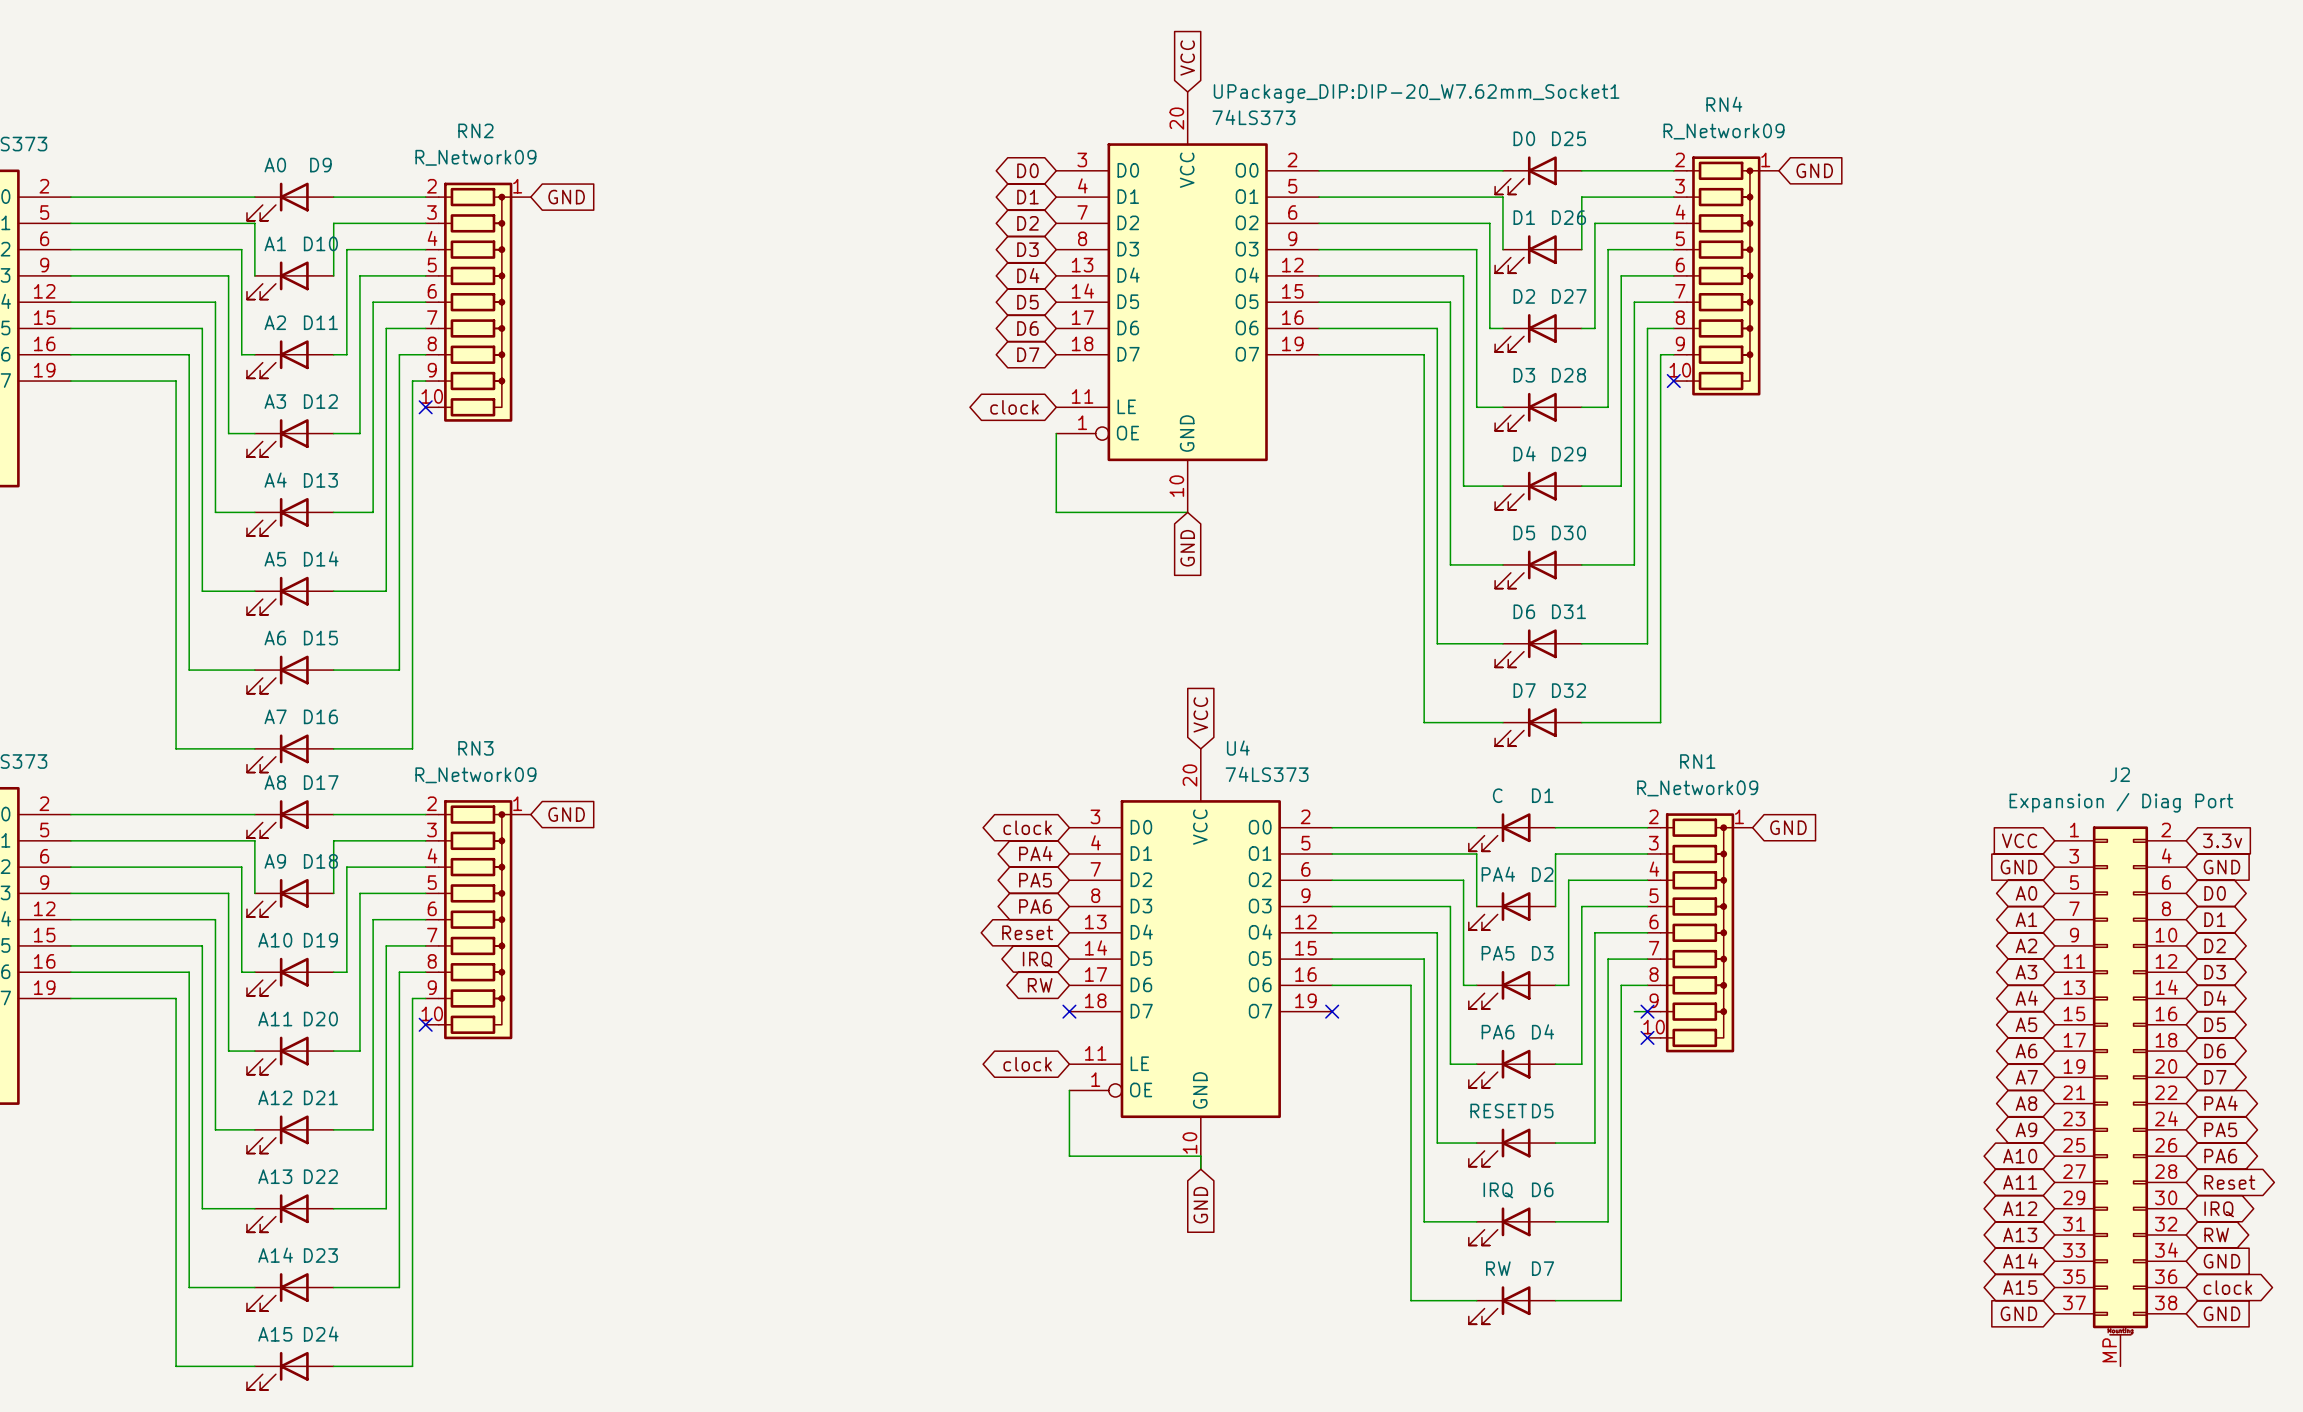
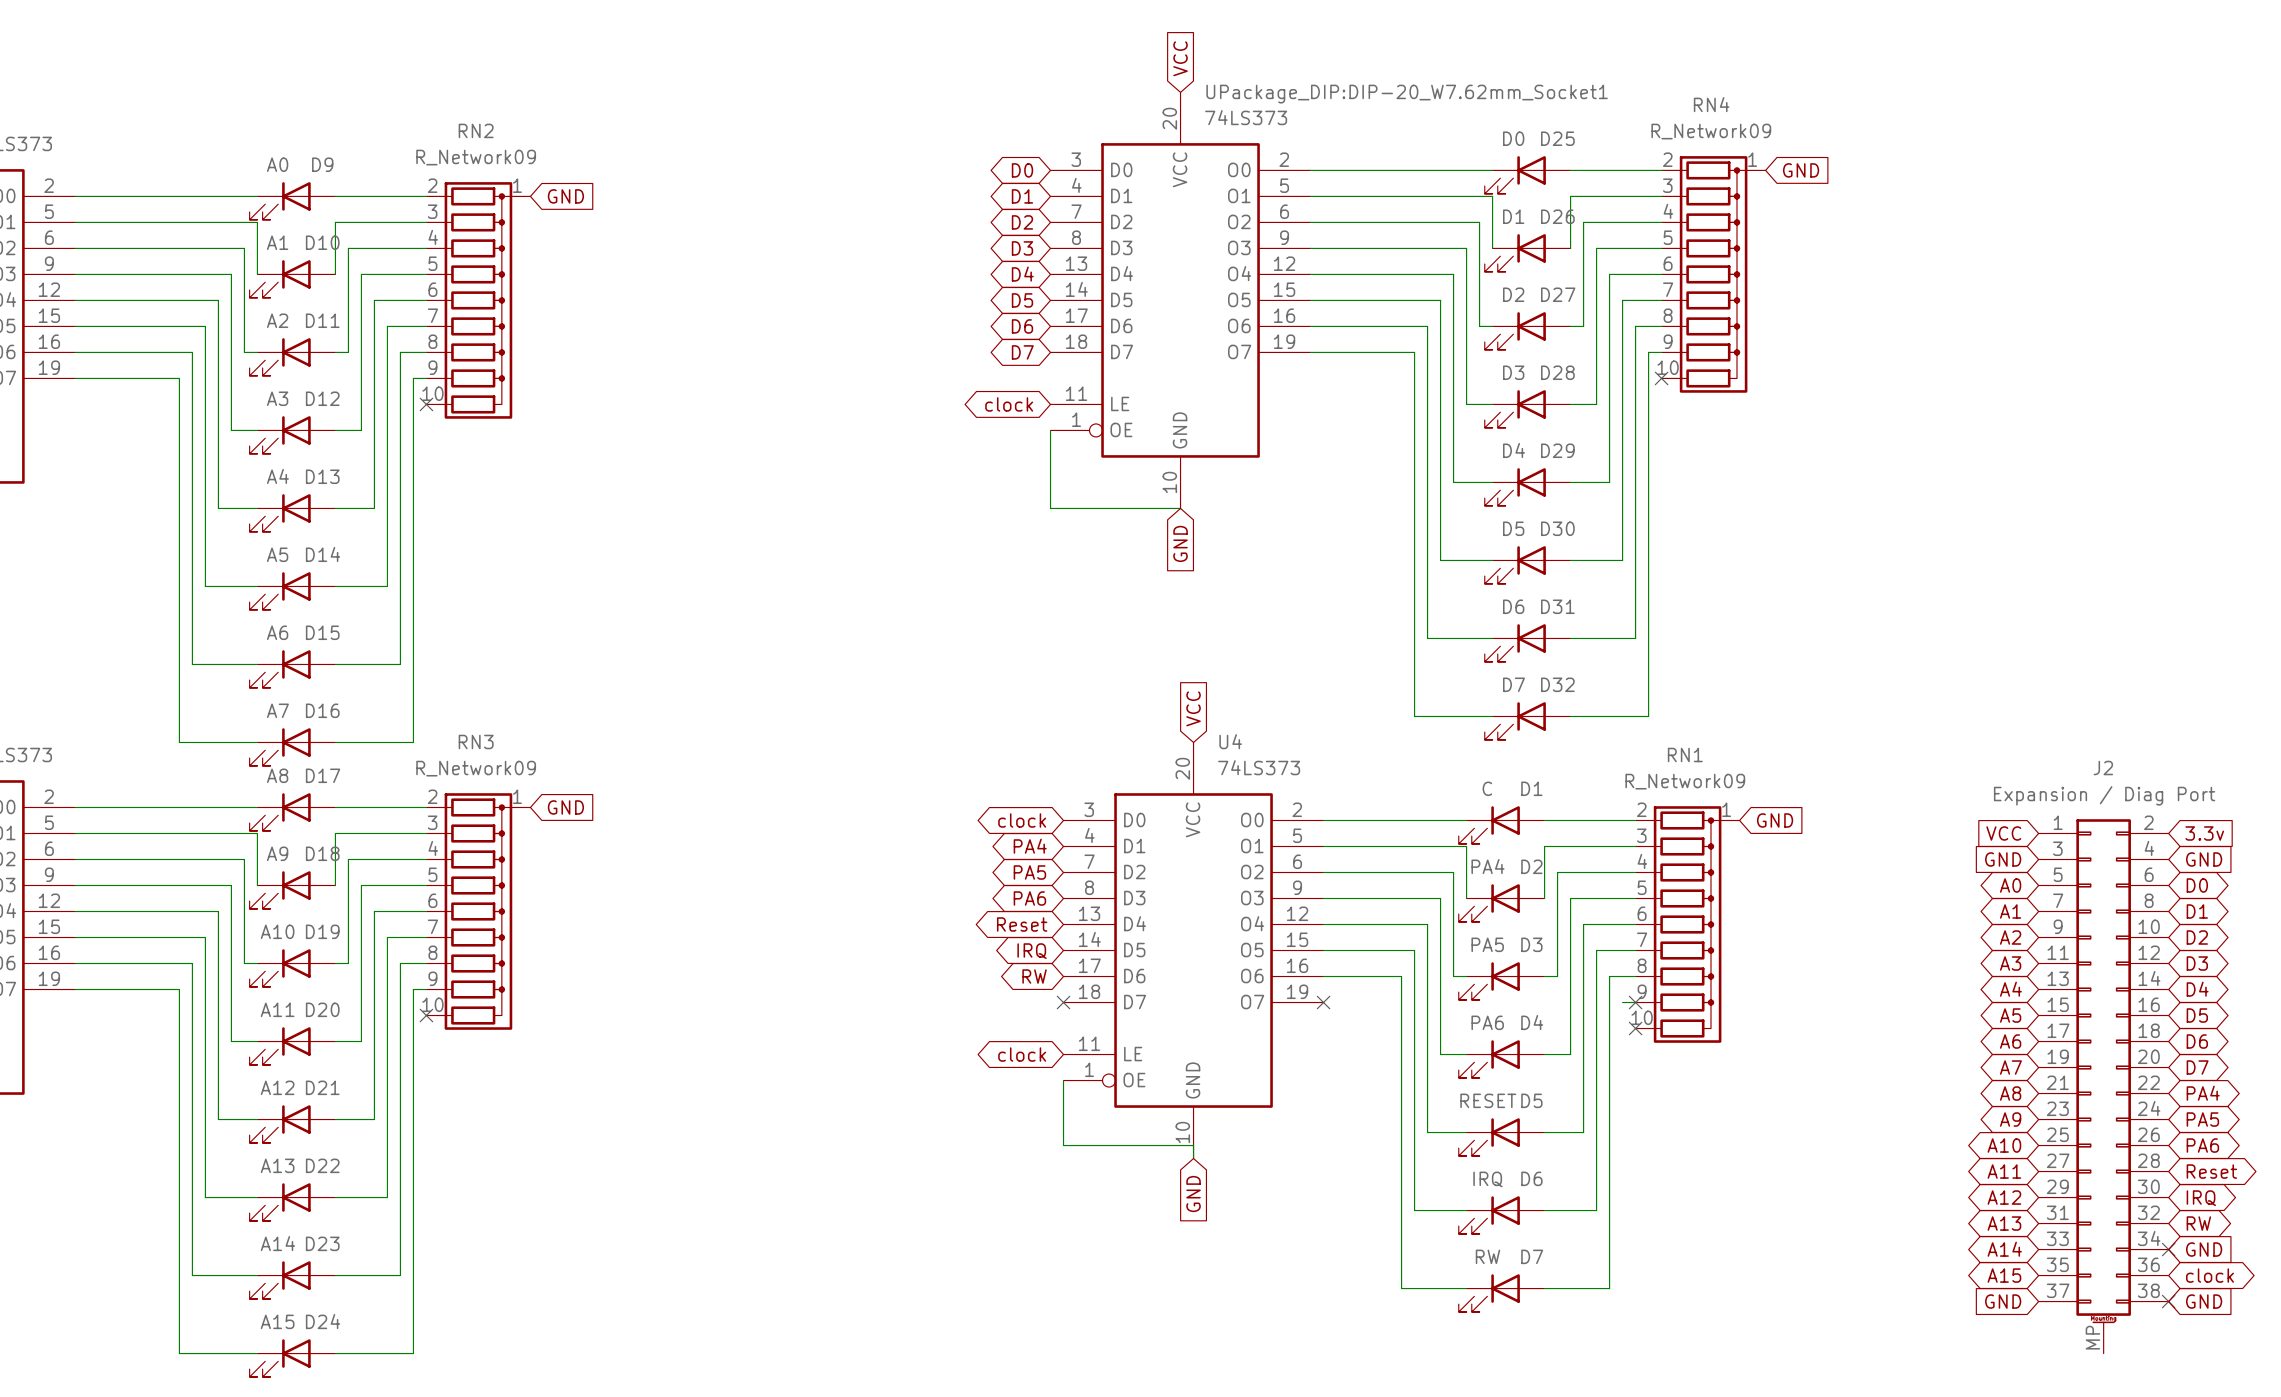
no-connect mark: none -> (2168, 1249)
no-connect mark: none -> (2168, 1301)

